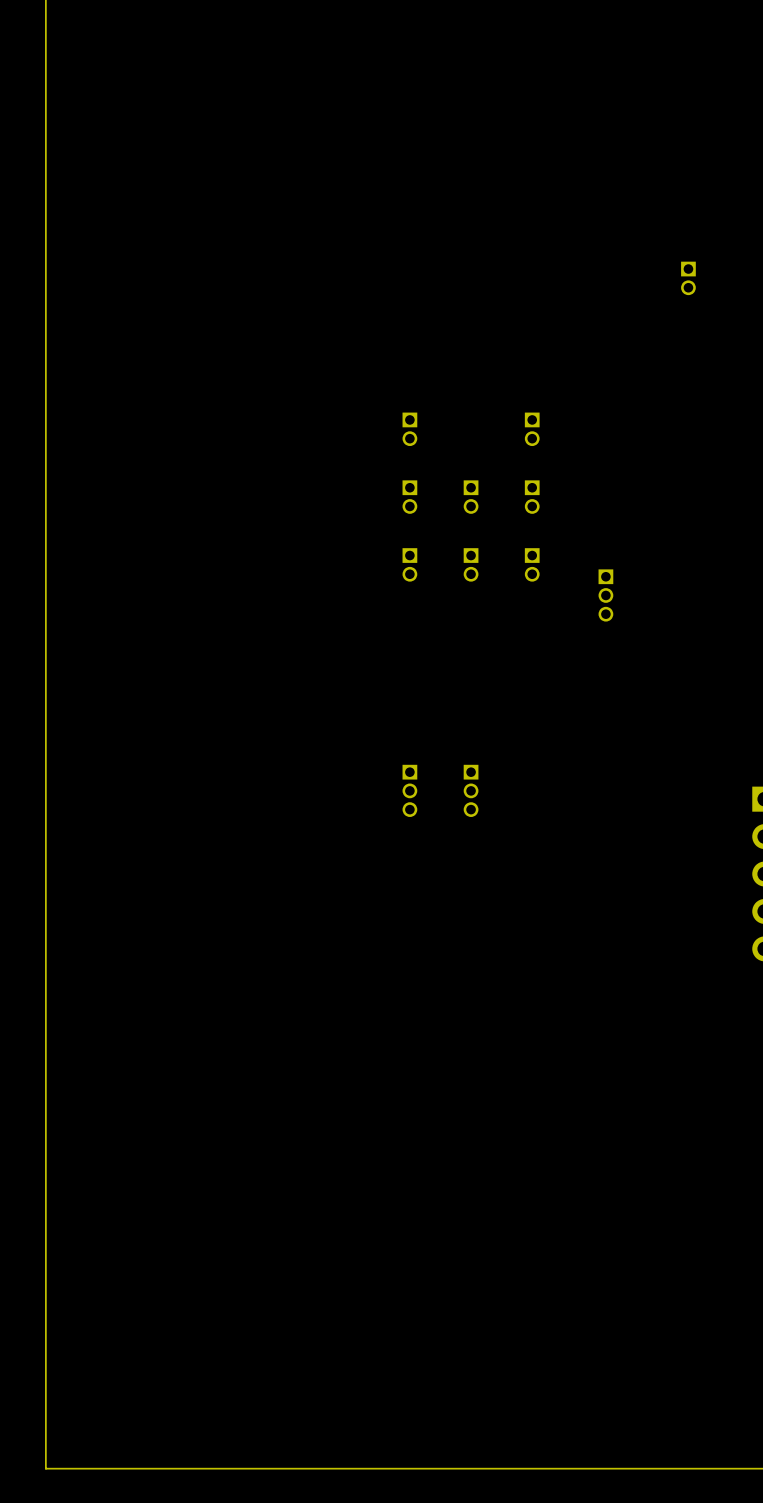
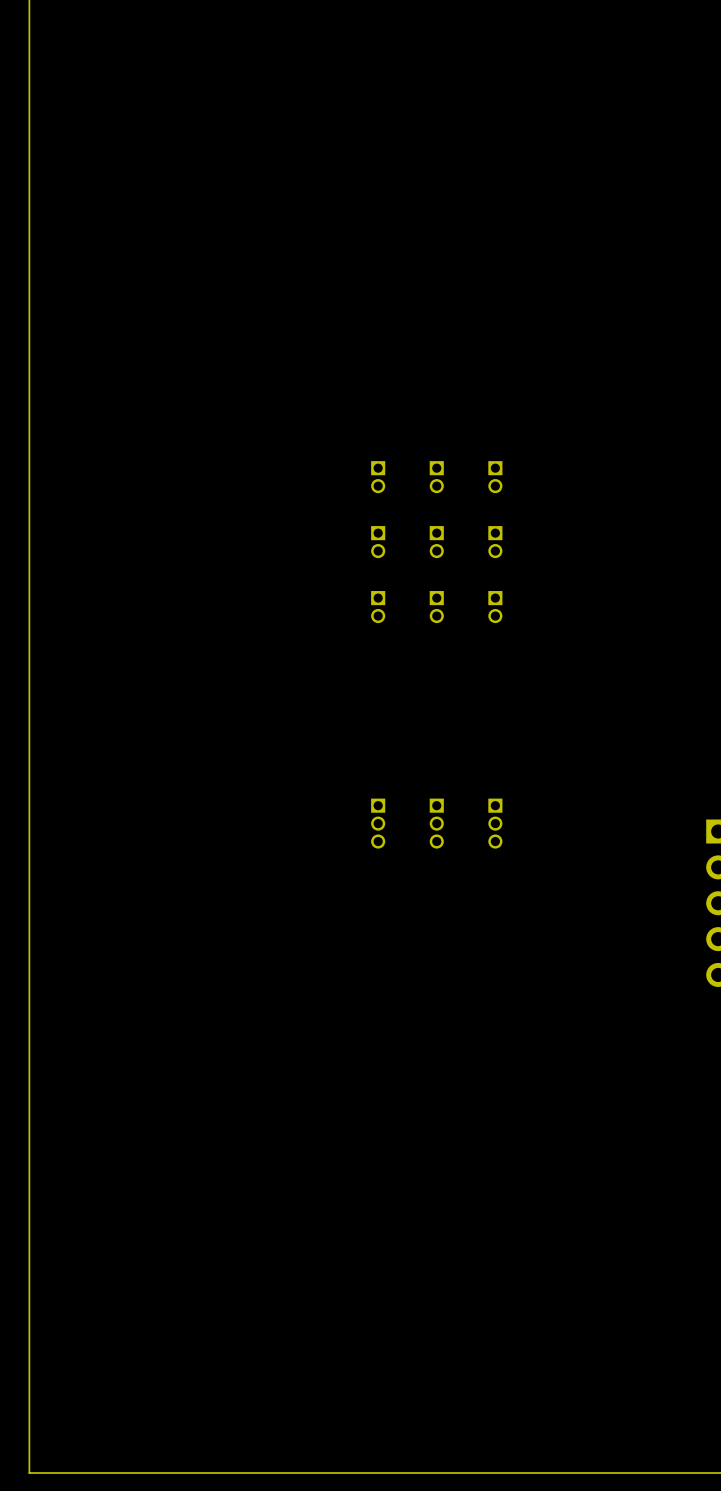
part position: (688, 278) -> (436, 477)
part position: (605, 595) -> (495, 823)

